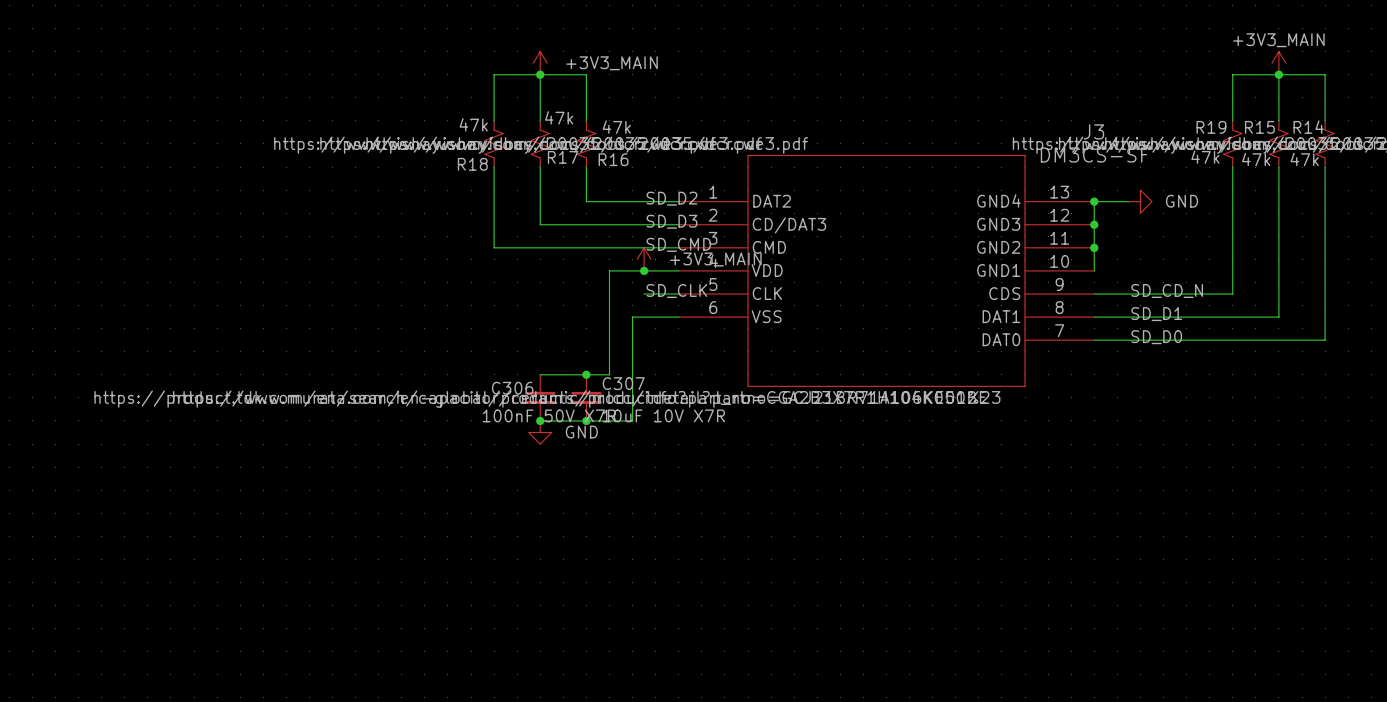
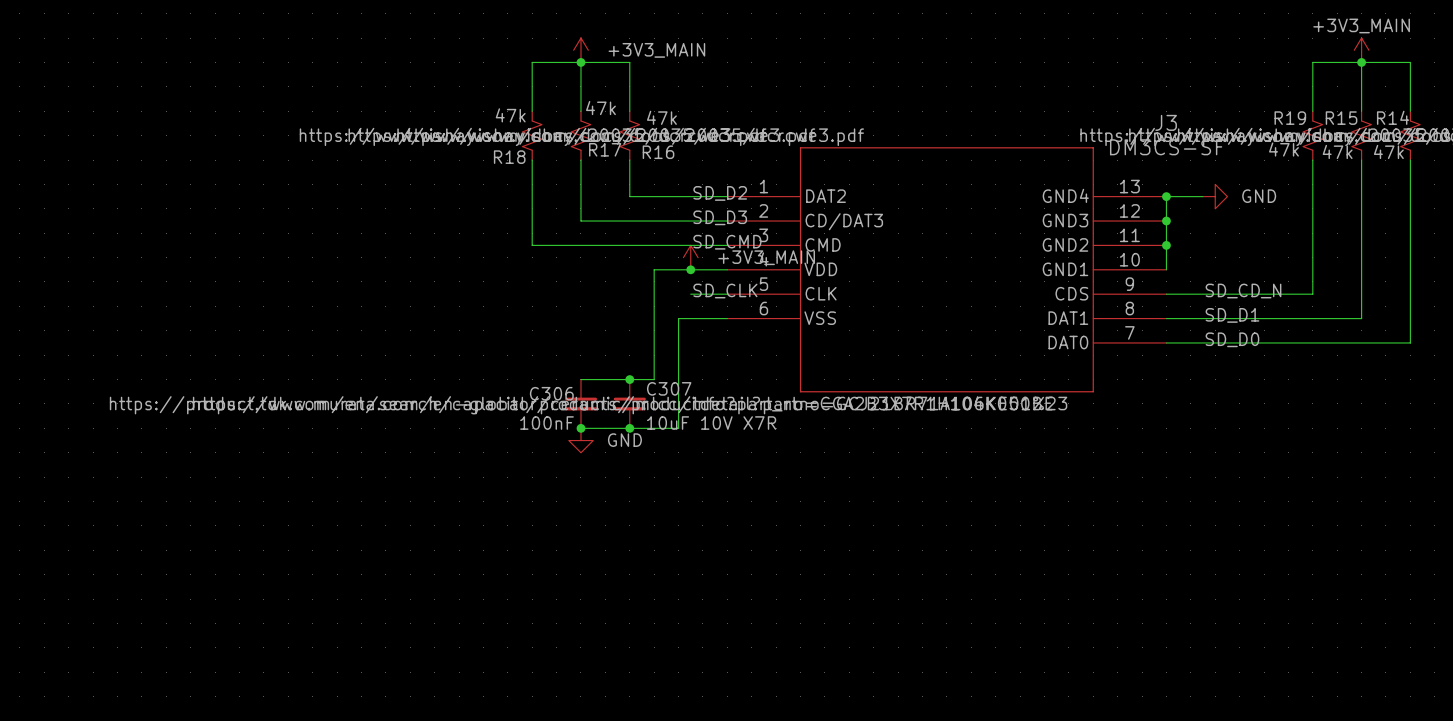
C306 value: 100nF 50V X7R (549, 415) -> 100nF (546, 423)

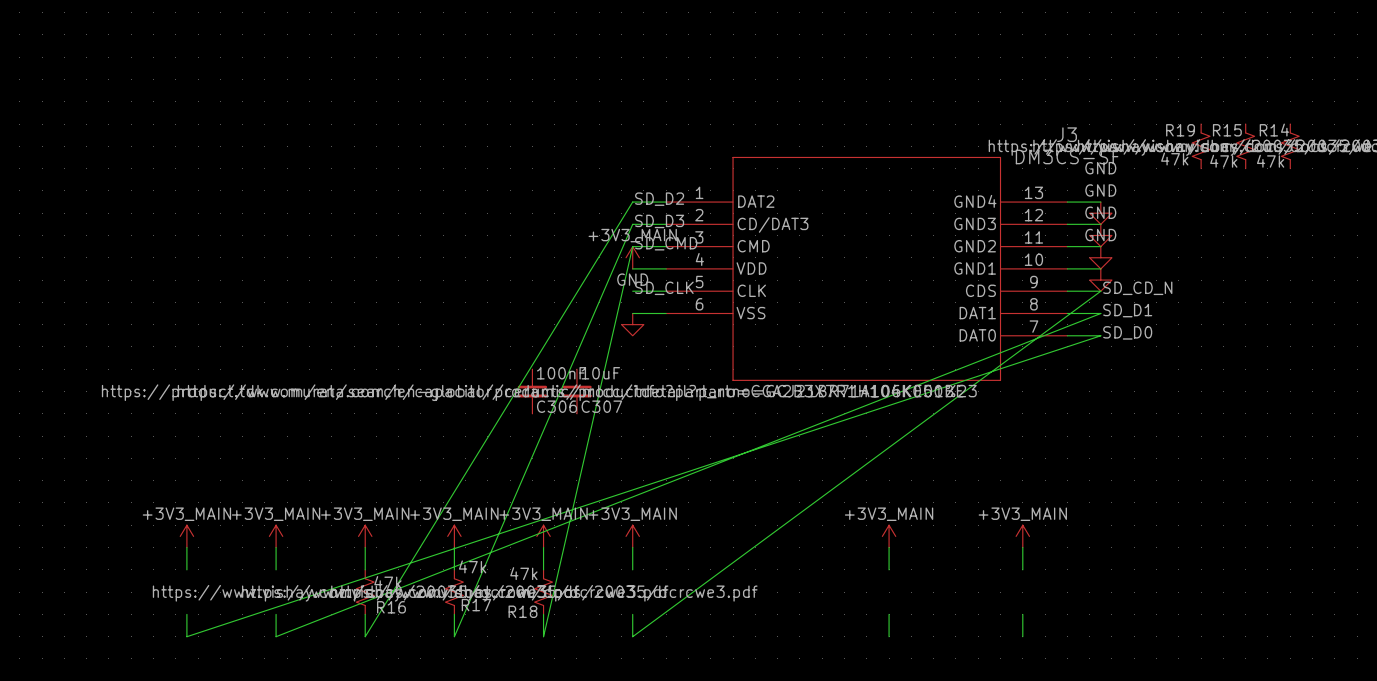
power symbol: +3V3_MAIN (580, 50) -> none
power symbol: +3V3_MAIN (1361, 50) -> none
wire: (580, 62) (580, 111) -> none
junction: (580, 62) -> none
wire: (1361, 62) (1361, 111) -> none
junction: (1361, 62) -> none
wire: (532, 111) (532, 62) (629, 62) (629, 111) -> none
wire: (1312, 111) (1312, 62) (1410, 62) (1410, 111) -> none
R16 value position: 47k (661, 117) -> 47k (387, 582)
R18 position: (532, 135) -> (543, 592)
R17 position: (580, 135) -> (454, 592)
R16 position: (629, 135) -> (365, 592)
wire: (532, 160) (532, 245) (690, 245) -> (543, 614) (543, 636) (632, 246)
wire: (580, 160) (580, 221) (690, 221) -> (454, 614) (454, 636) (632, 224)
wire: (629, 160) (629, 196) (690, 196) -> (365, 614) (365, 636) (632, 202)
wire: (1312, 160) (1312, 294) (1203, 294) -> (632, 614) (632, 636) (1100, 291)
wire: (1361, 160) (1361, 318) (1203, 318) -> (276, 614) (276, 636) (1100, 313)
wire: (1410, 160) (1410, 342) (1203, 342) -> (186, 614) (186, 636) (1100, 335)
wire: (1166, 196) (1166, 269) -> (1100, 268) (1067, 268)
junction: (1166, 196) -> none
power symbol rotation: 0° (1215, 196) -> 90° clockwise (1100, 213)
power symbol position: GND (1215, 196) -> GND (1100, 213)
power symbol text position: GND (1259, 196) -> GND (1100, 168)
wire: none -> (1067, 224) (1100, 224)
junction: (1166, 221) -> none
power symbol: none -> GND (1100, 235)
wire: none -> (1067, 246) (1100, 246)
junction: (1166, 245) -> none
power symbol text position: +3V3_MAIN (766, 257) -> +3V3_MAIN (632, 235)
power symbol: none -> GND (1100, 257)
wire: (690, 269) (654, 269) (654, 379) (580, 379) -> none
junction: (690, 269) -> none
power symbol: none -> GND (1100, 280)
wire: (690, 318) (678, 318) (678, 428) (580, 428) -> none
junction: (629, 379) -> none
C307 name position: C307 (669, 388) -> C307 (601, 406)
C306 name position: C306 (551, 393) -> C306 (557, 406)
C306 value position: 100nF (546, 423) -> 100nF (561, 373)
C307 value: 10uF 10V X7R (711, 423) -> 10uF (600, 373)
junction: (580, 428) -> none
junction: (629, 428) -> none
power symbol position: GND (580, 440) -> GND (632, 324)
power symbol text position: GND (624, 440) -> GND (632, 279)
power symbol: none -> +3V3_MAIN (186, 536)
power symbol: none -> +3V3_MAIN (276, 536)
power symbol: none -> +3V3_MAIN (365, 536)
power symbol: none -> +3V3_MAIN (454, 536)
power symbol: none -> +3V3_MAIN (543, 536)
power symbol: none -> +3V3_MAIN (632, 536)
power symbol: none -> +3V3_MAIN (889, 536)
power symbol: none -> +3V3_MAIN (1022, 536)
wire: none -> (186, 547) (186, 569)
wire: none -> (276, 547) (276, 569)
wire: none -> (365, 547) (365, 569)
wire: none -> (454, 547) (454, 569)
wire: none -> (543, 547) (543, 569)
wire: none -> (632, 547) (632, 569)
wire: none -> (889, 547) (889, 569)
wire: none -> (1022, 547) (1022, 569)
wire: none -> (889, 614) (889, 636)
wire: none -> (1022, 614) (1022, 636)

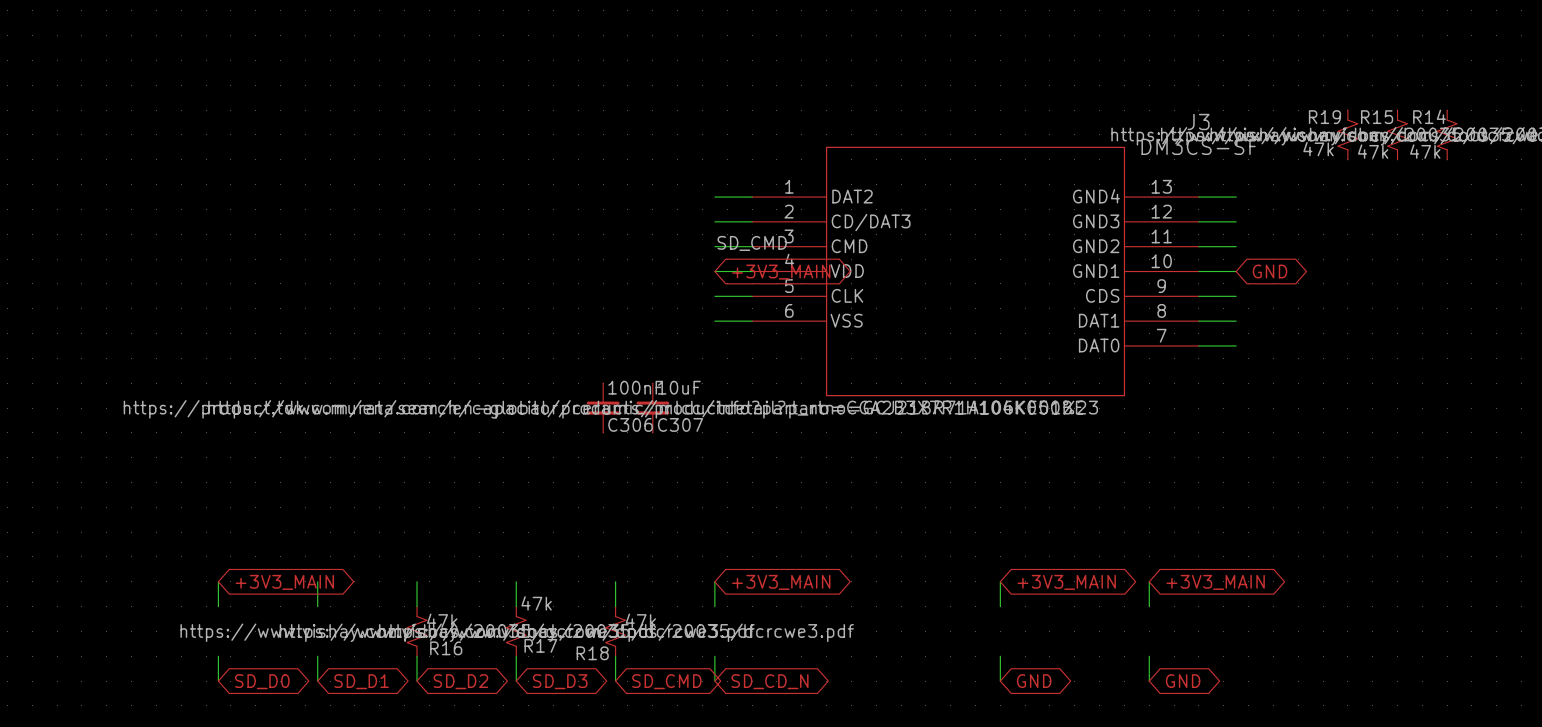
label: SD_D2 (659, 199) -> none
wire: (632, 202) (365, 636) -> none
power symbol: GND (1100, 213) -> none
label: SD_D3 (659, 221) -> none
wire: (632, 224) (454, 636) -> none
power symbol: GND (1100, 235) -> none
wire: (632, 246) (543, 636) -> none
power symbol: +3V3_MAIN (632, 257) -> none
power symbol: GND (1100, 257) -> none
global label: none -> GND (1270, 271)
global label: none -> +3V3_MAIN (781, 272)
power symbol: GND (1100, 280) -> none
label: SD_CLK (664, 288) -> none
label: SD_CD_N (1137, 288) -> none
wire: (1100, 291) (632, 636) -> none
label: SD_D1 (1127, 310) -> none
wire: (1100, 313) (276, 636) -> none
power symbol: GND (632, 324) -> none
label: SD_D0 (1127, 332) -> none
wire: (1100, 335) (186, 636) -> none
power symbol: +3V3_MAIN (186, 536) -> none
power symbol: +3V3_MAIN (276, 536) -> none
power symbol: +3V3_MAIN (365, 536) -> none
power symbol: +3V3_MAIN (454, 536) -> none
power symbol: +3V3_MAIN (543, 536) -> none
power symbol: +3V3_MAIN (632, 536) -> none
power symbol: +3V3_MAIN (889, 536) -> none
power symbol: +3V3_MAIN (1022, 536) -> none
global label: none -> +3V3_MAIN (284, 582)
global label: none -> +3V3_MAIN (781, 582)
global label: none -> +3V3_MAIN (1066, 582)
global label: none -> +3V3_MAIN (1215, 582)
R18 value position: 47k (523, 573) -> 47k (640, 620)
global label: none -> GND (1034, 681)
global label: none -> GND (1183, 681)
global label: none -> SD_D0 (262, 681)
global label: none -> SD_D1 (361, 681)
global label: none -> SD_D2 (460, 681)
global label: none -> SD_D3 (560, 681)
global label: none -> SD_CMD (666, 681)
global label: none -> SD_CD_N (770, 681)

